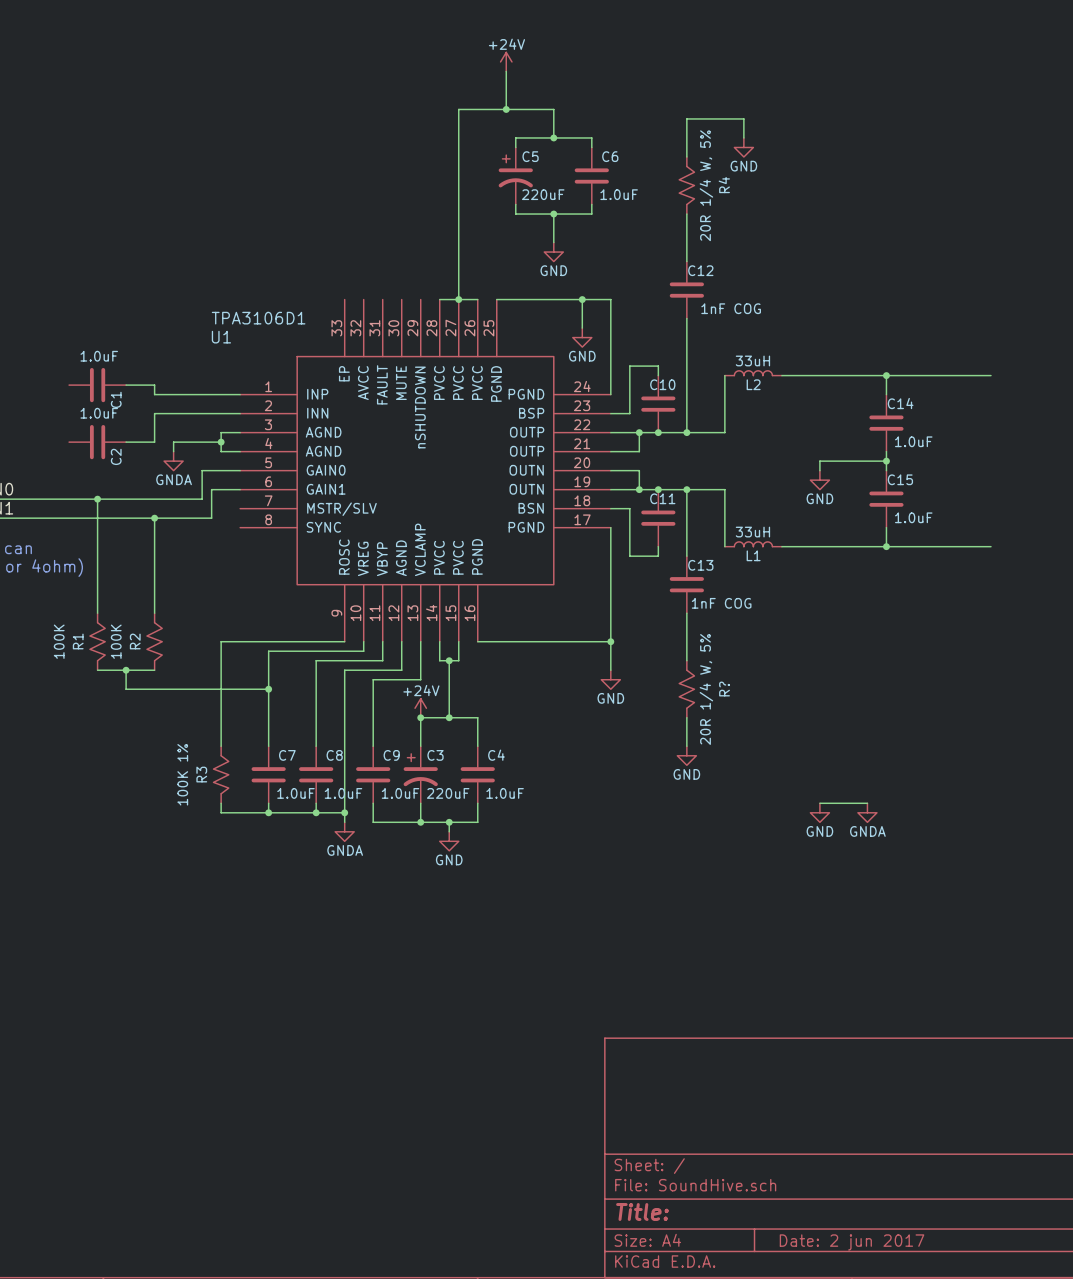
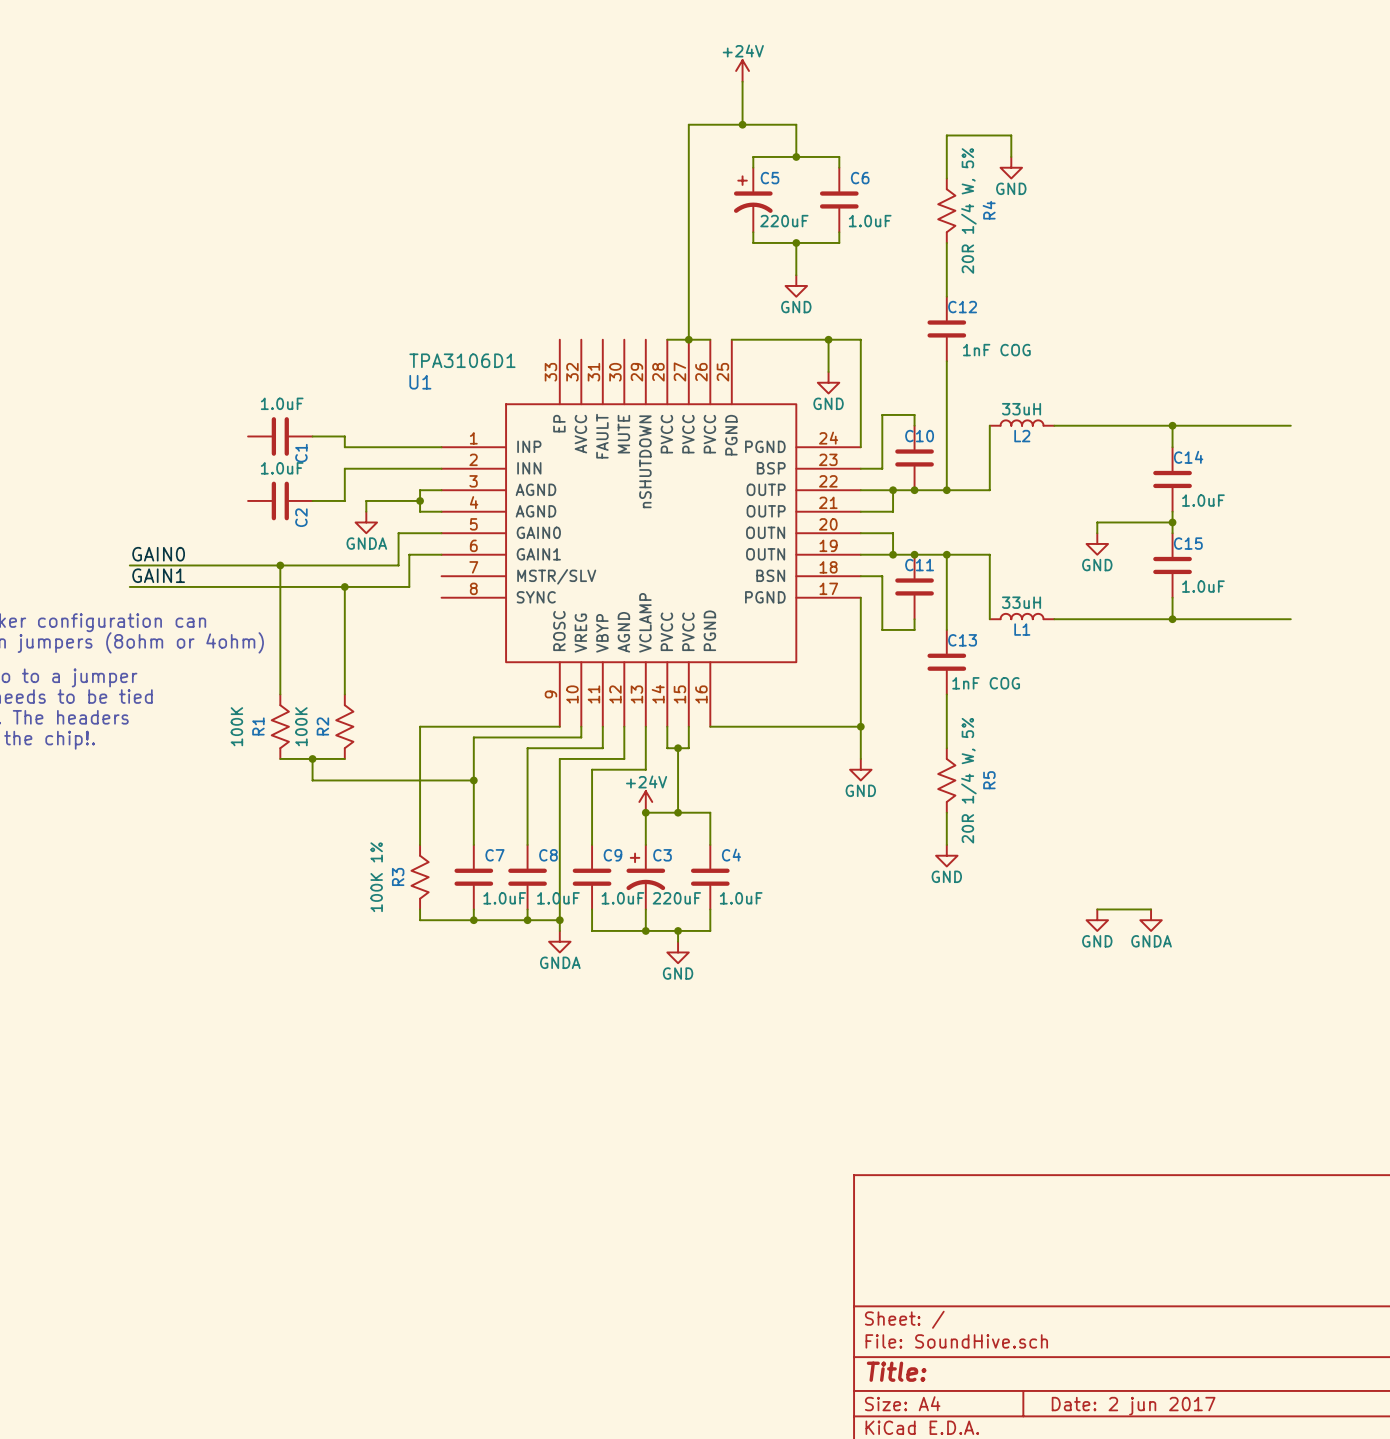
R? name: R? (724, 689) -> R5 (989, 780)

